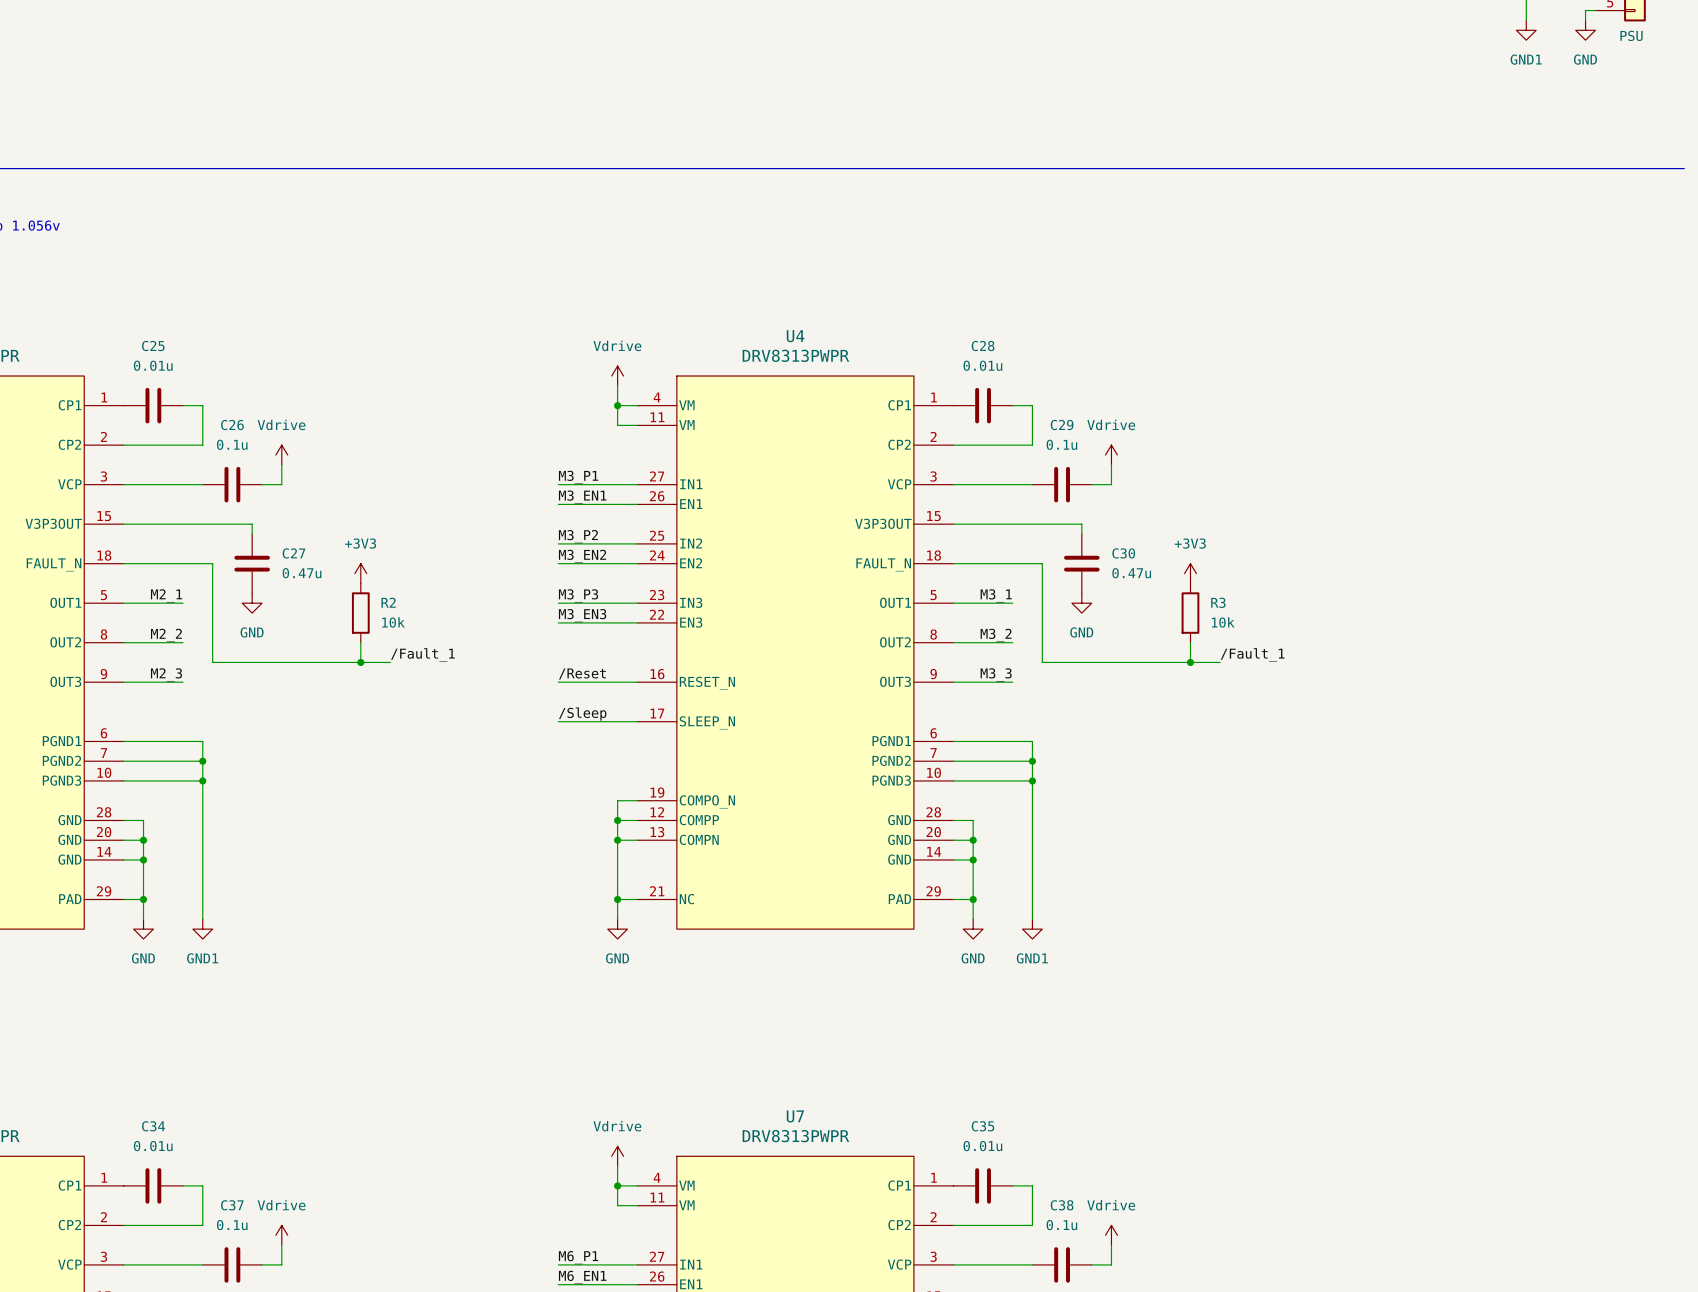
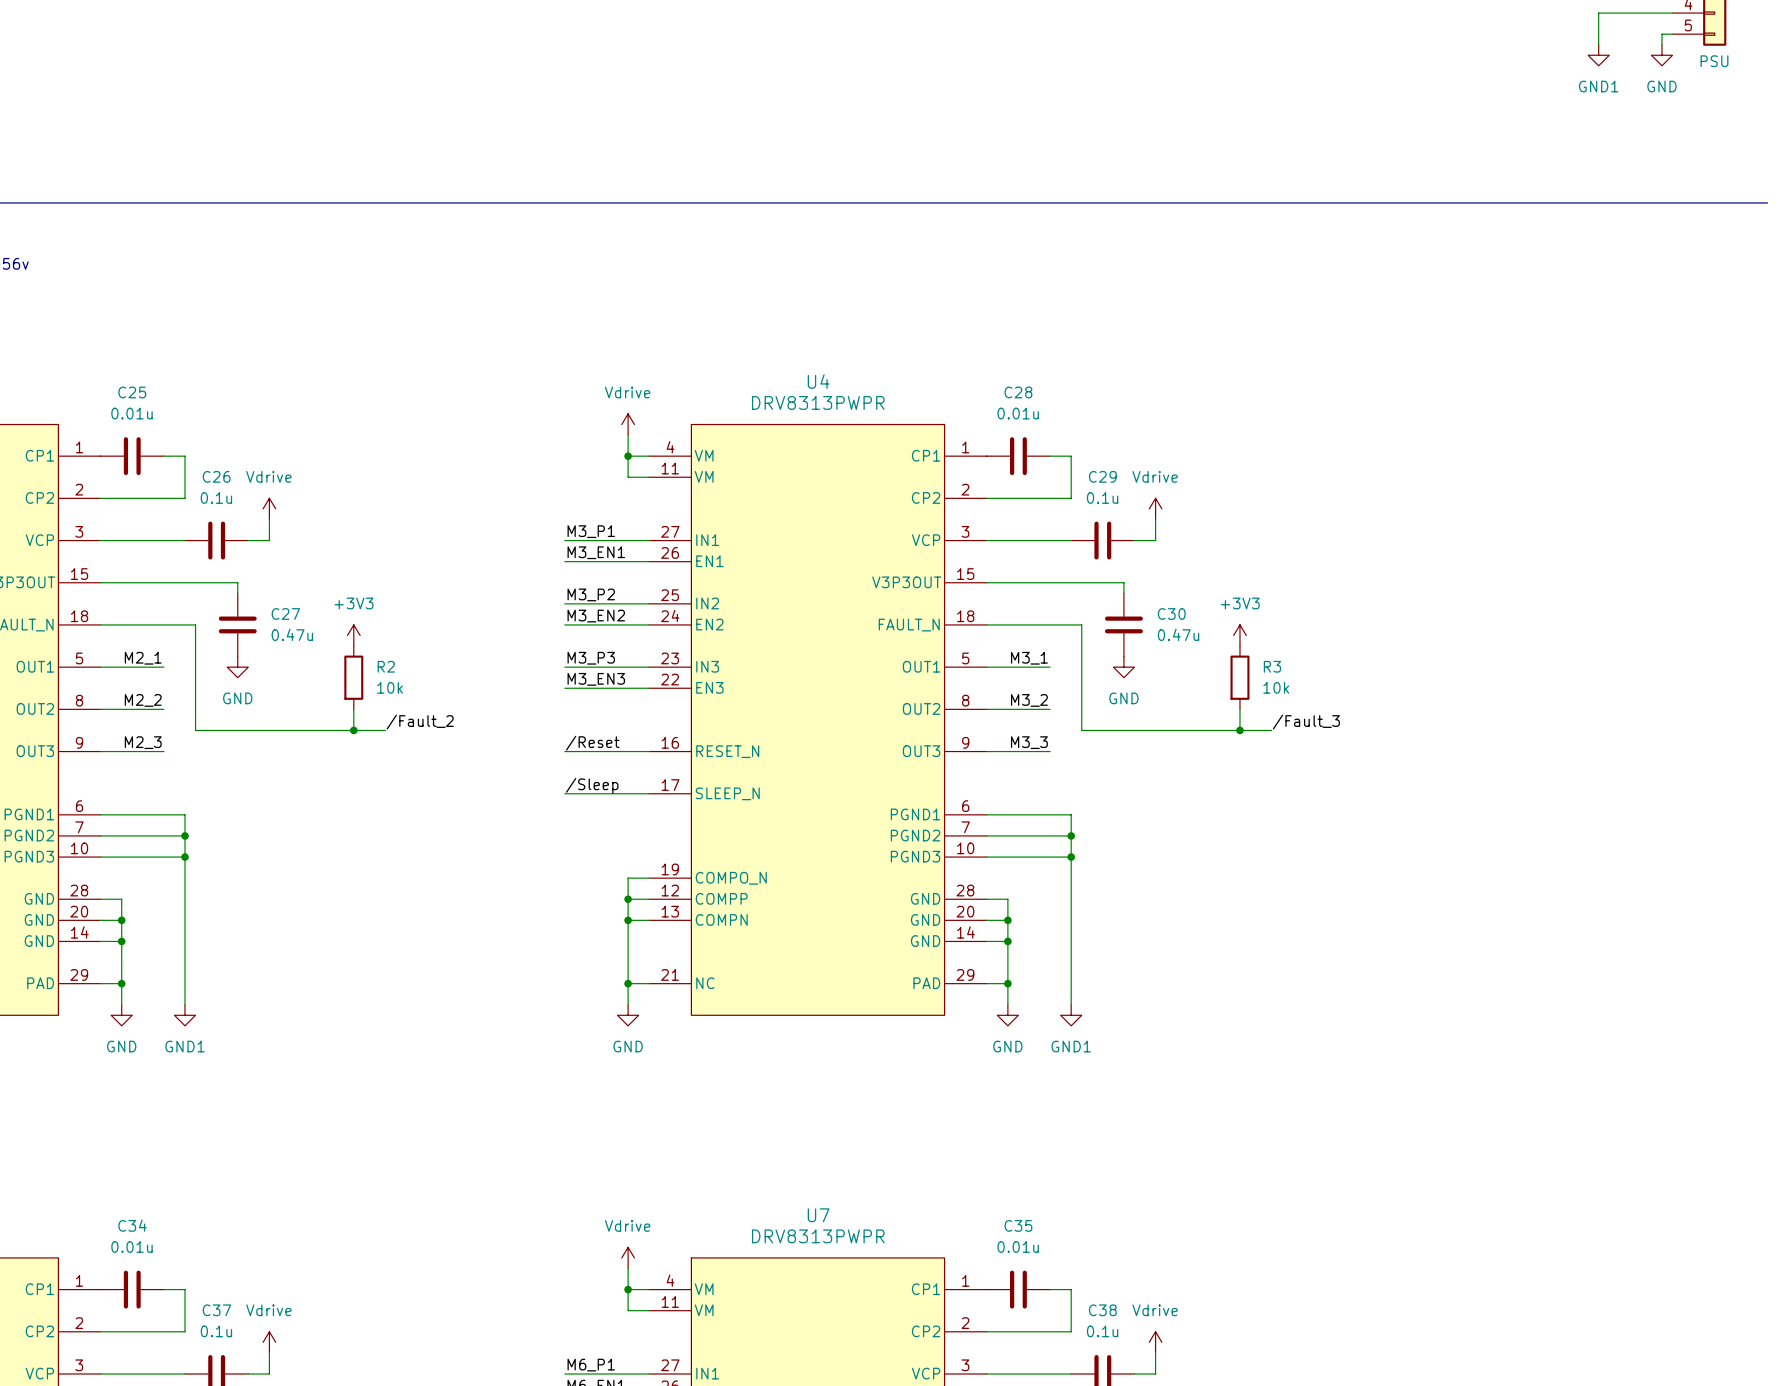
label: /Fault_1 (422, 654) -> /Fault_2 (420, 722)
label: /Fault_1 (1252, 654) -> /Fault_3 (1306, 722)

